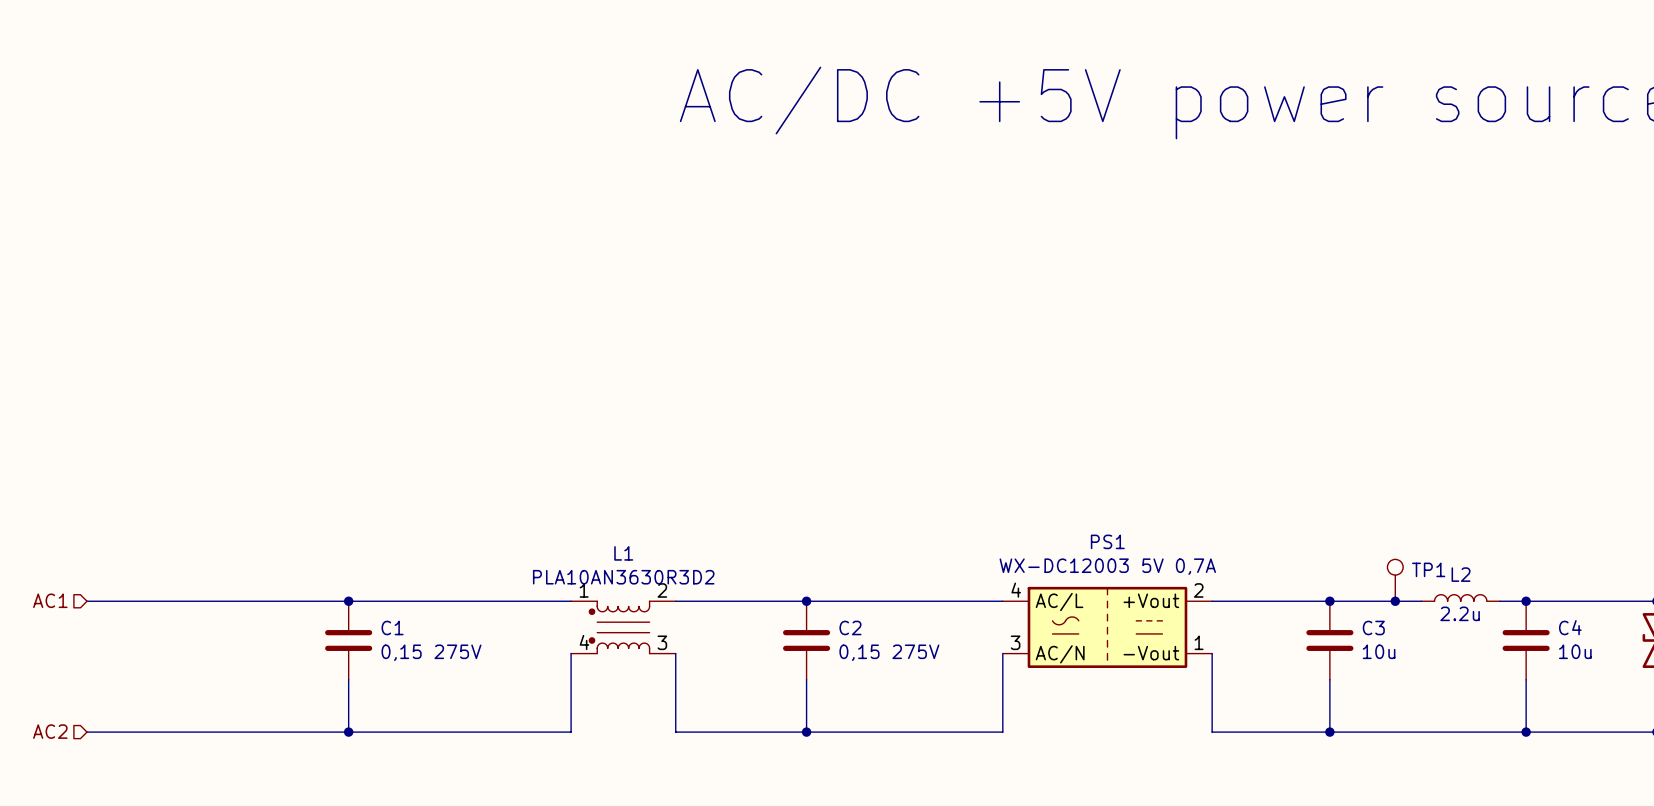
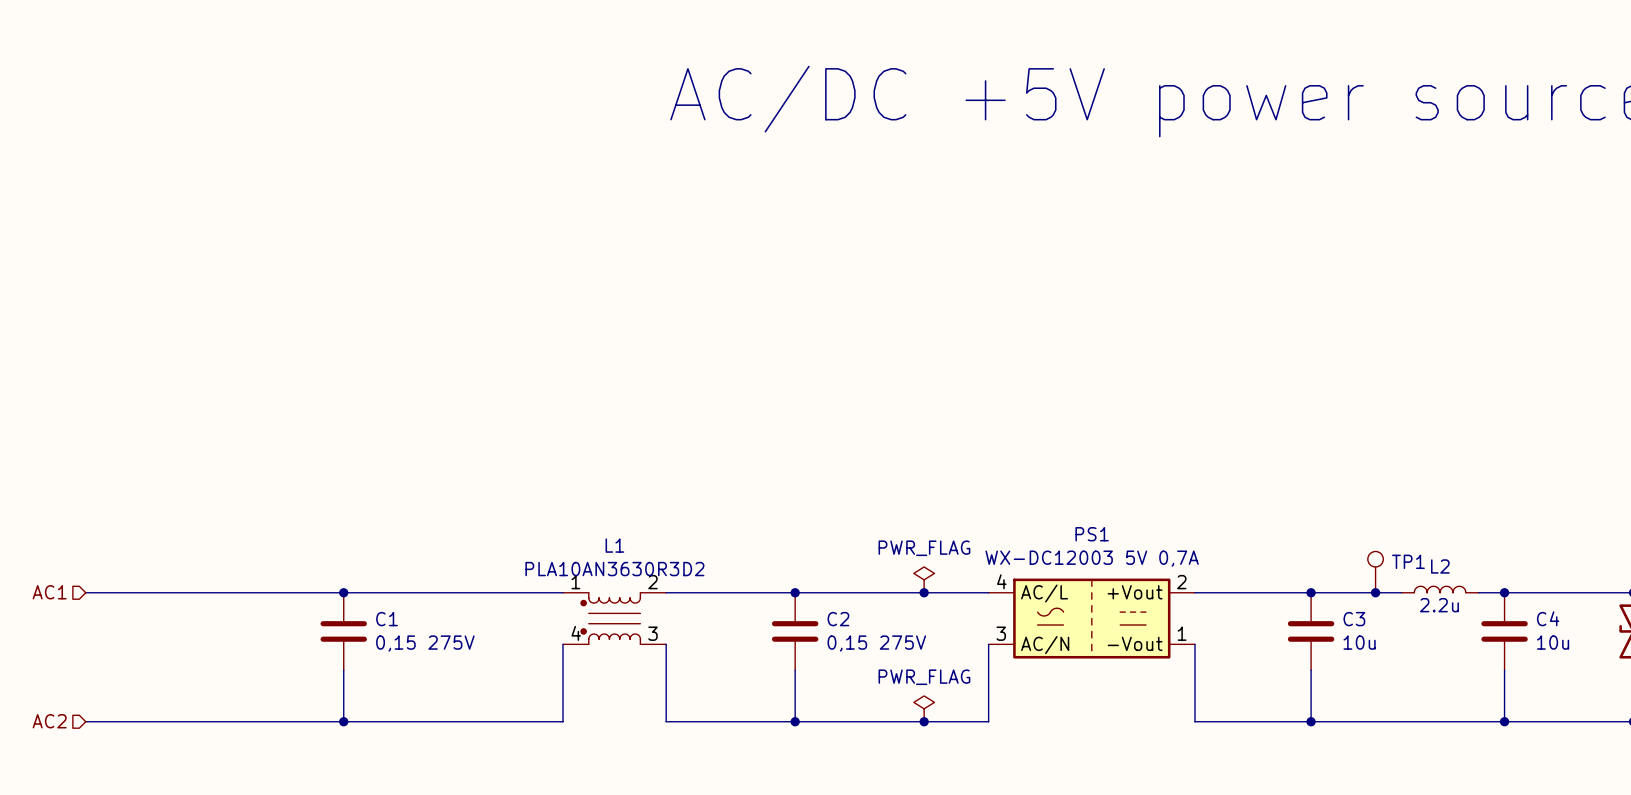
power symbol: none -> PWR_FLAG (924, 579)
junction: none -> (924, 592)
power symbol: none -> PWR_FLAG (924, 708)
junction: none -> (924, 721)

